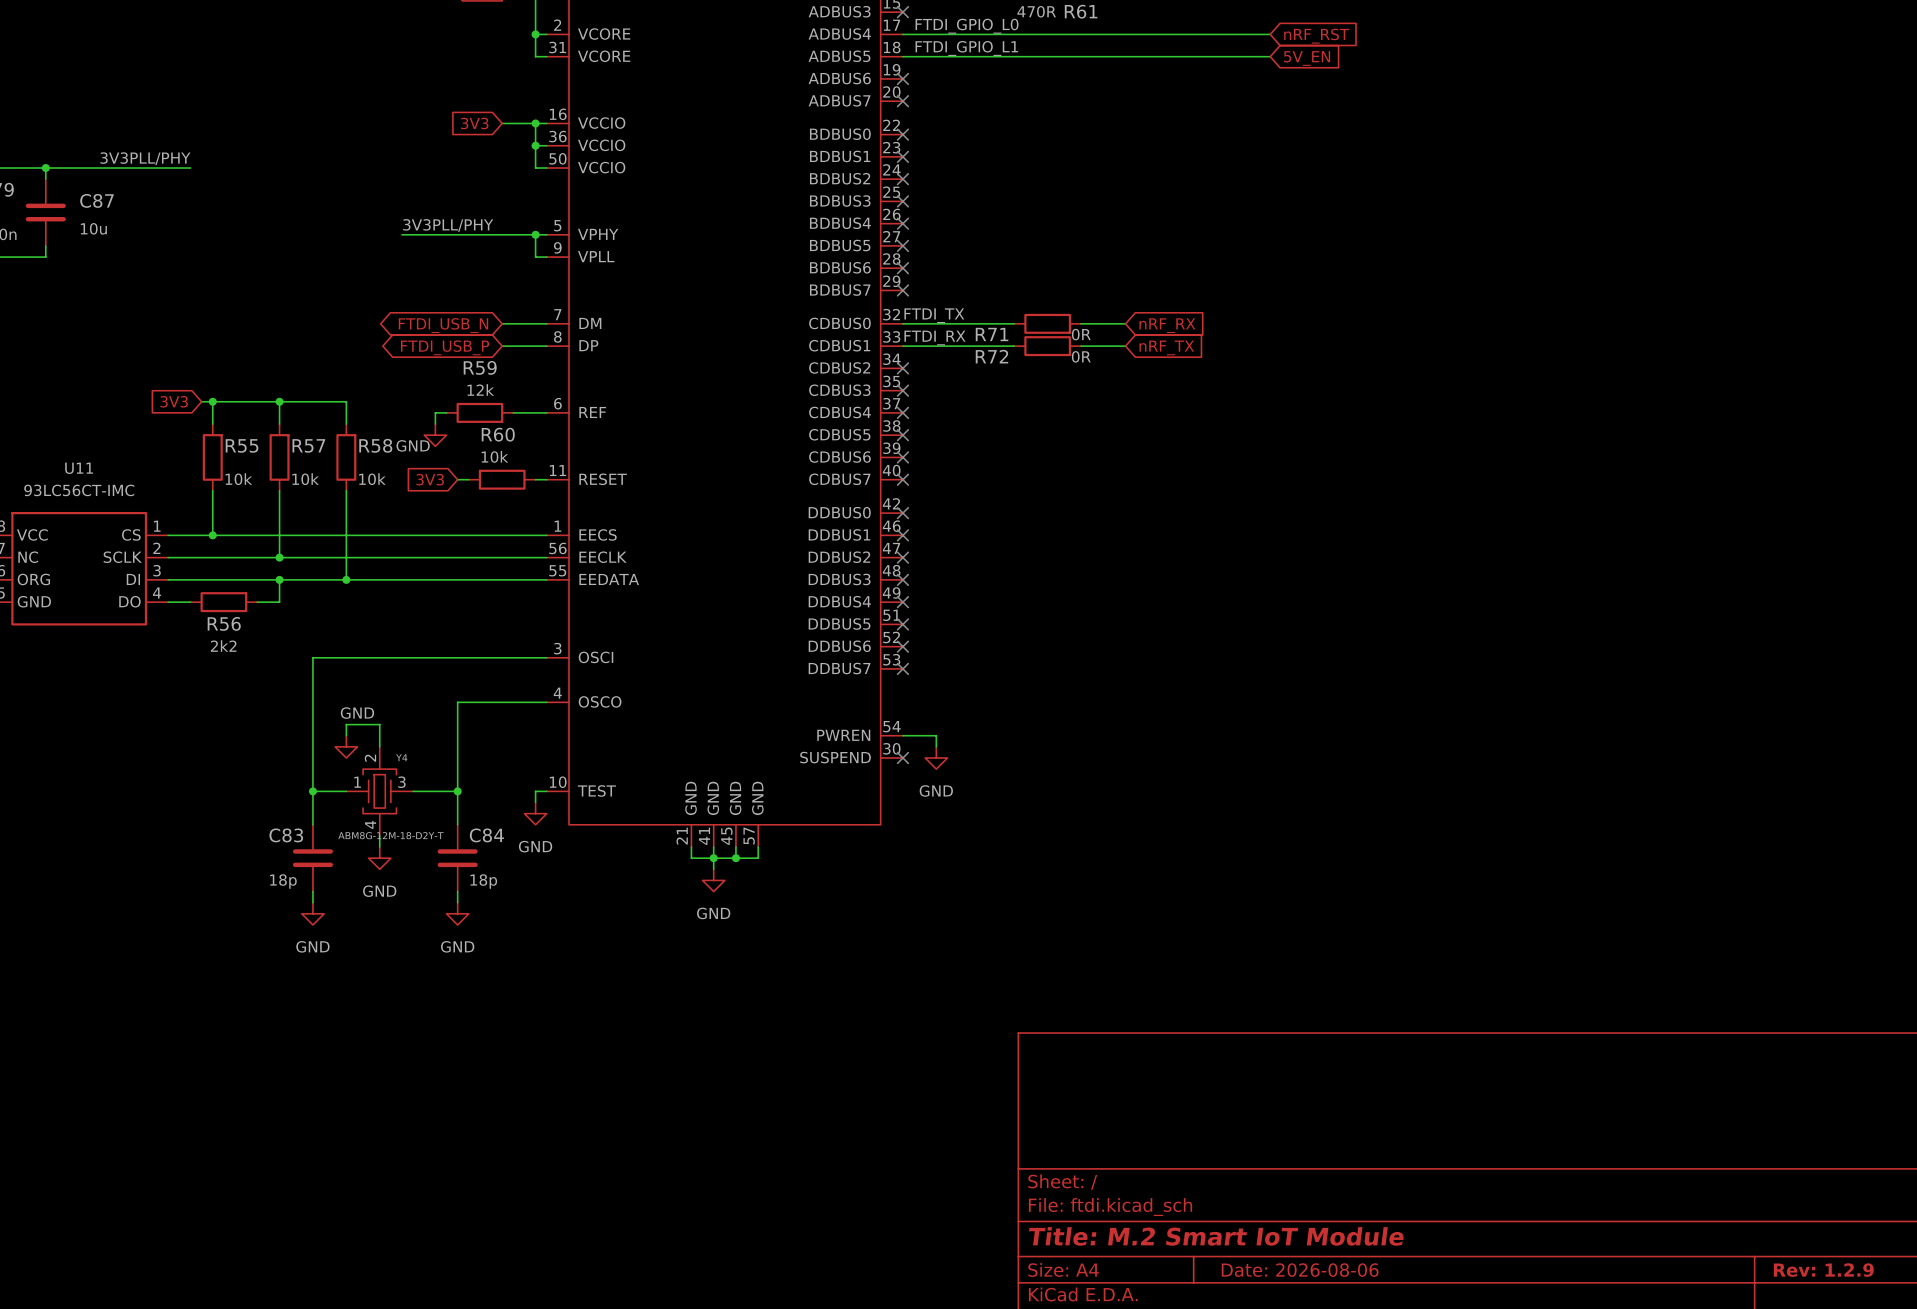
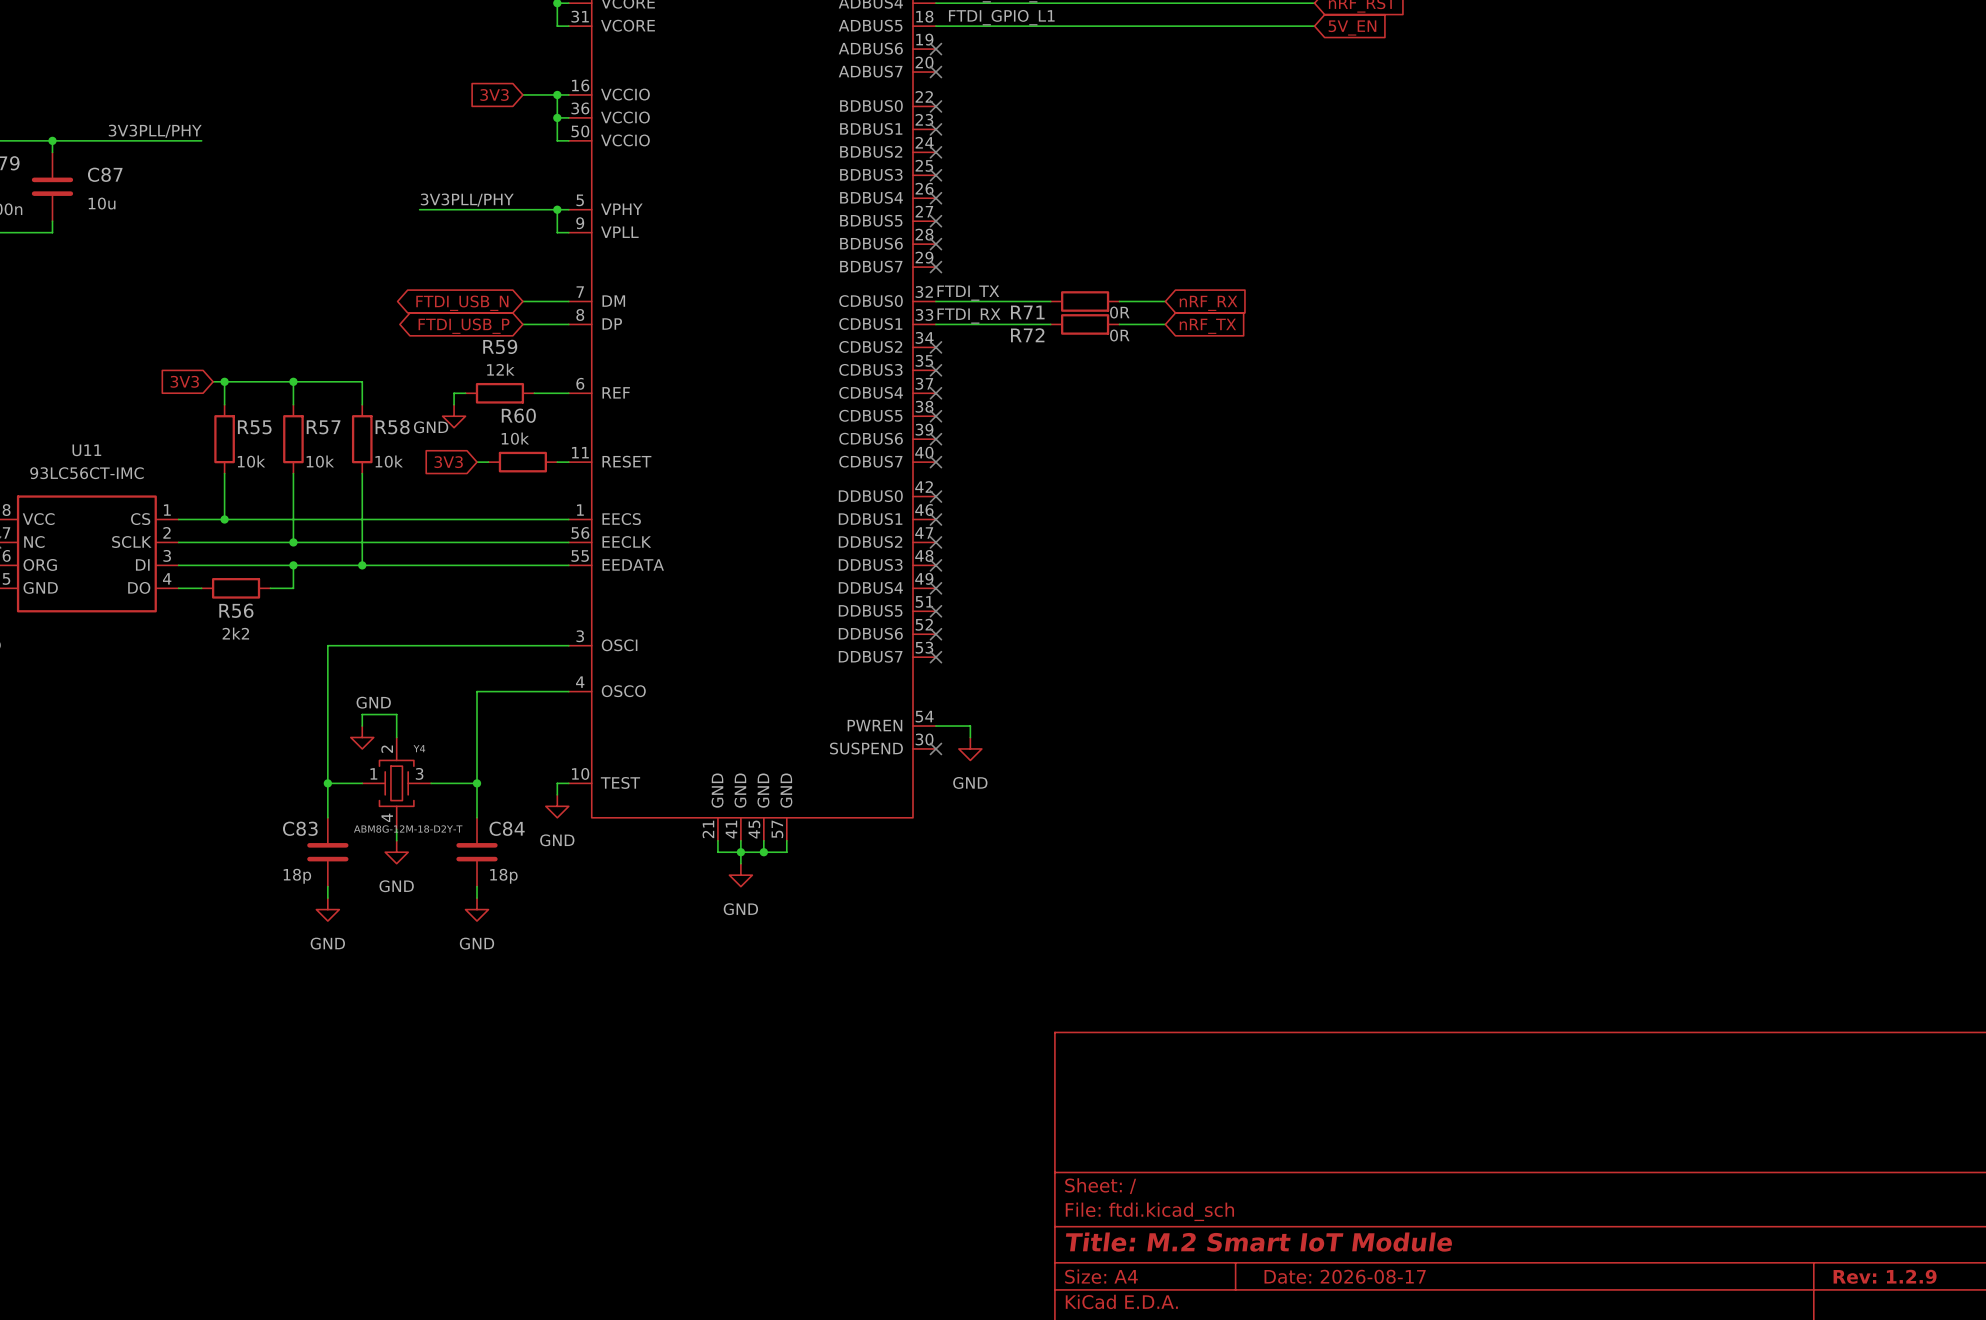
title block: Date: 2026-08-06 (1300, 1270) -> Date: 2026-08-17 (1345, 1276)

